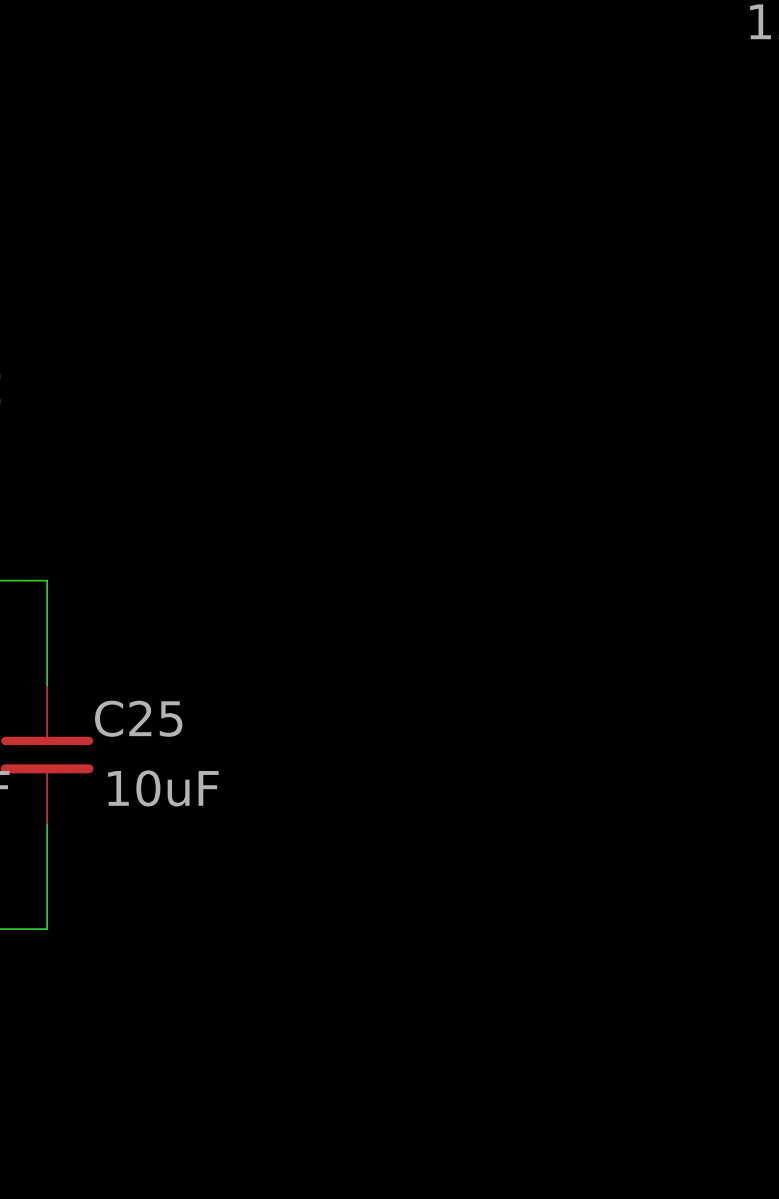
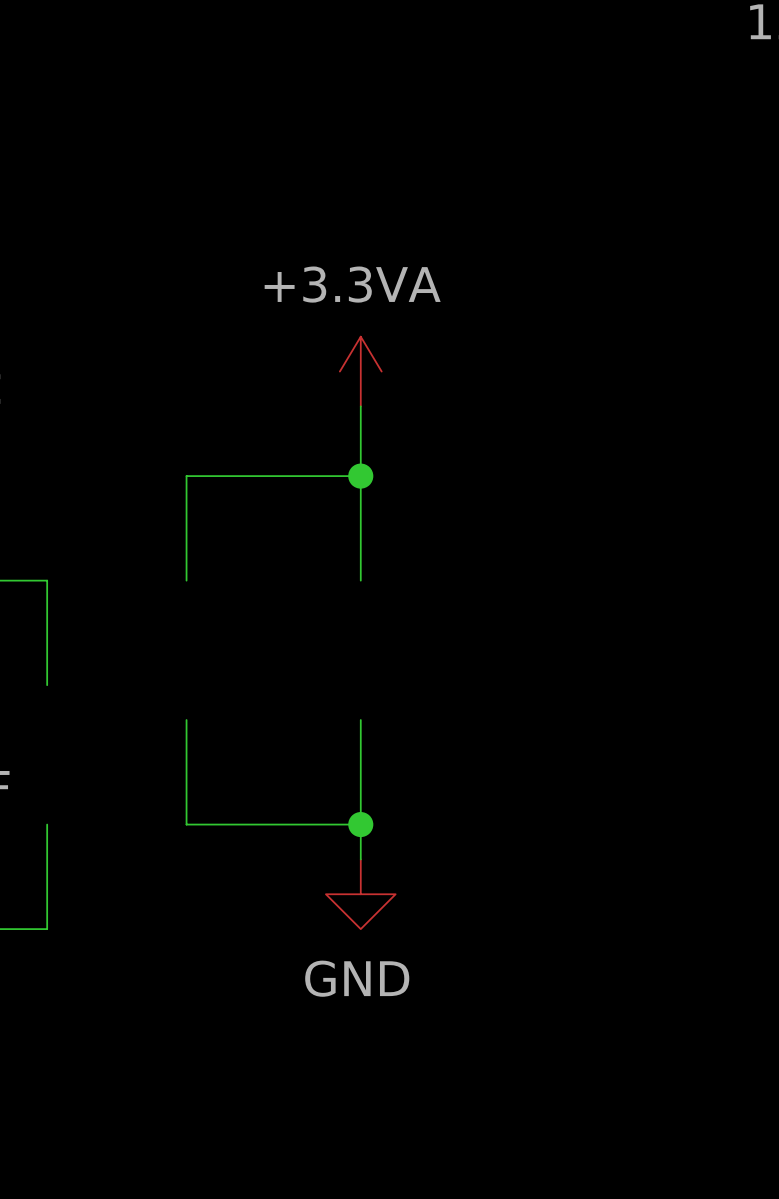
power symbol: none -> +3.3VA (360, 371)
wire: none -> (360, 406) (360, 580)
wire: none -> (360, 476) (186, 476) (186, 580)
junction: none -> (360, 476)
wire: none -> (186, 720) (186, 824) (360, 824)
wire: none -> (360, 720) (360, 859)
C25: 10uF (47, 754) -> none
junction: none -> (360, 824)
power symbol: none -> GND (360, 894)

